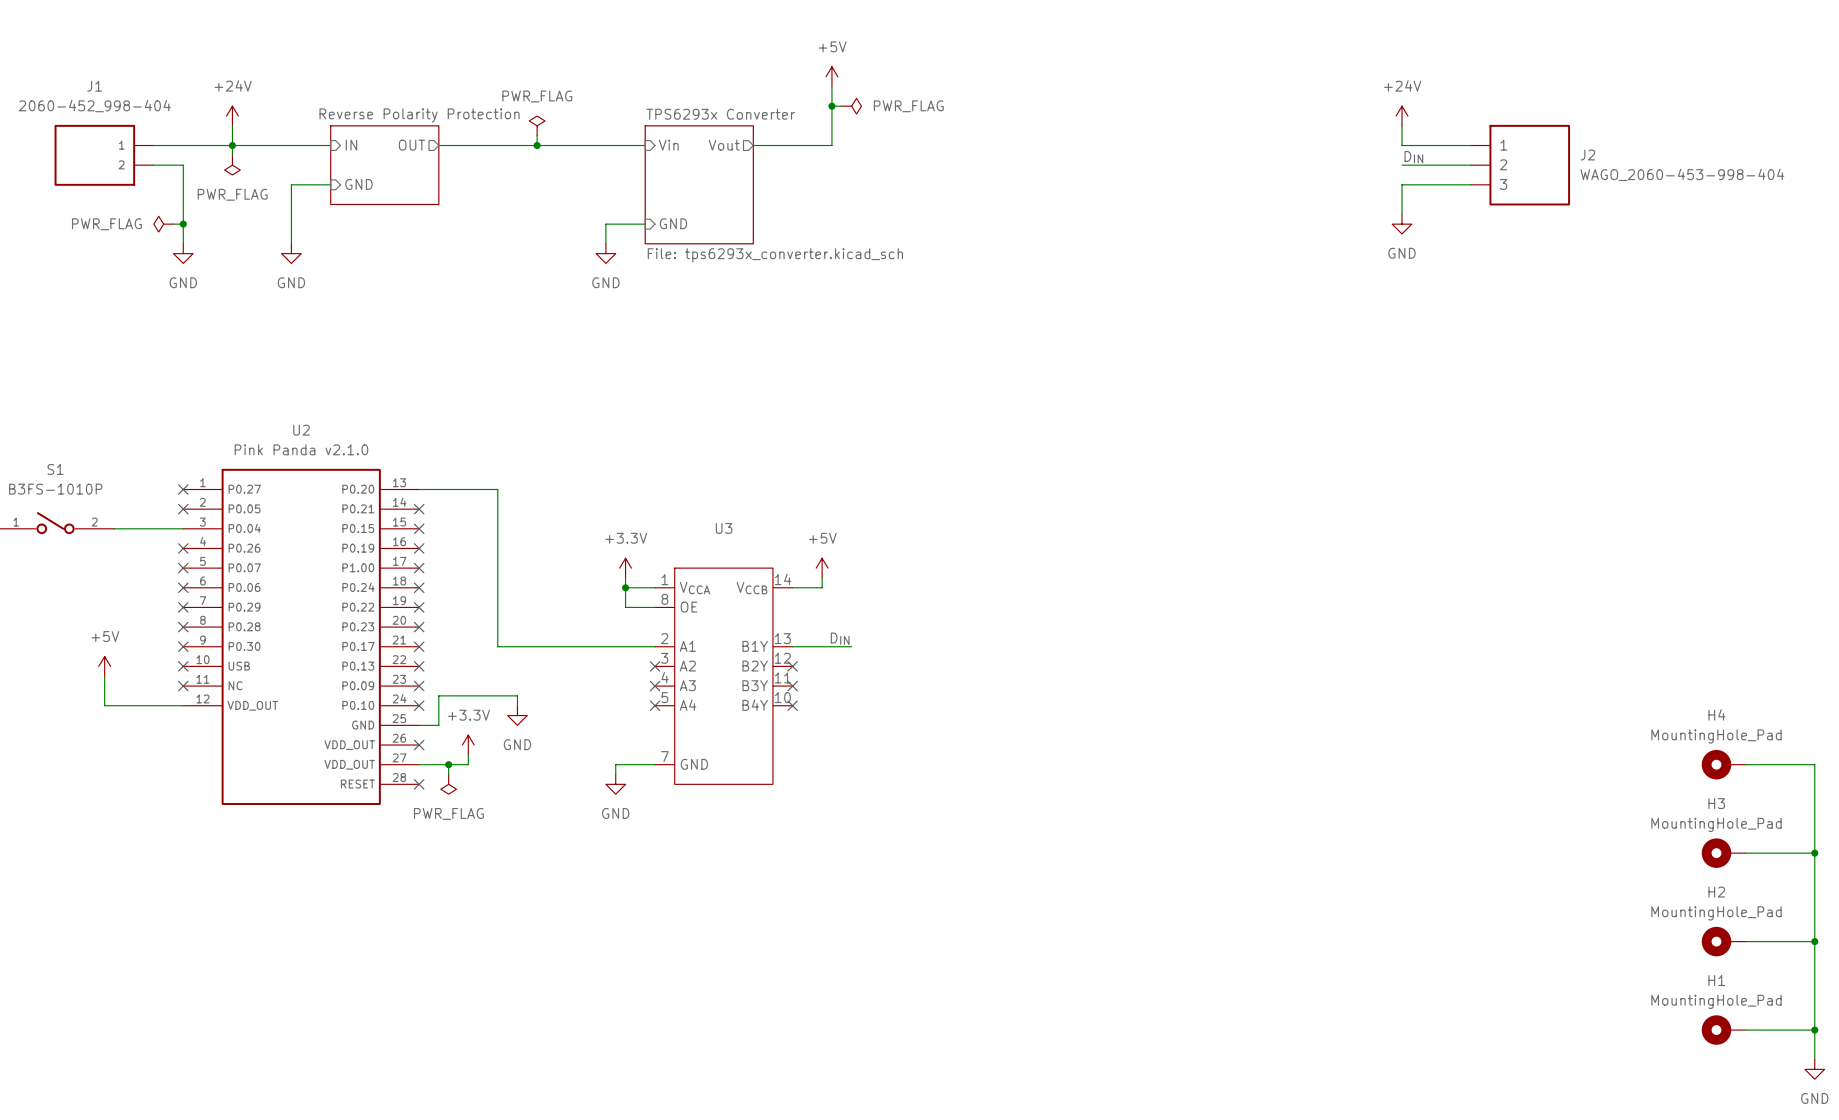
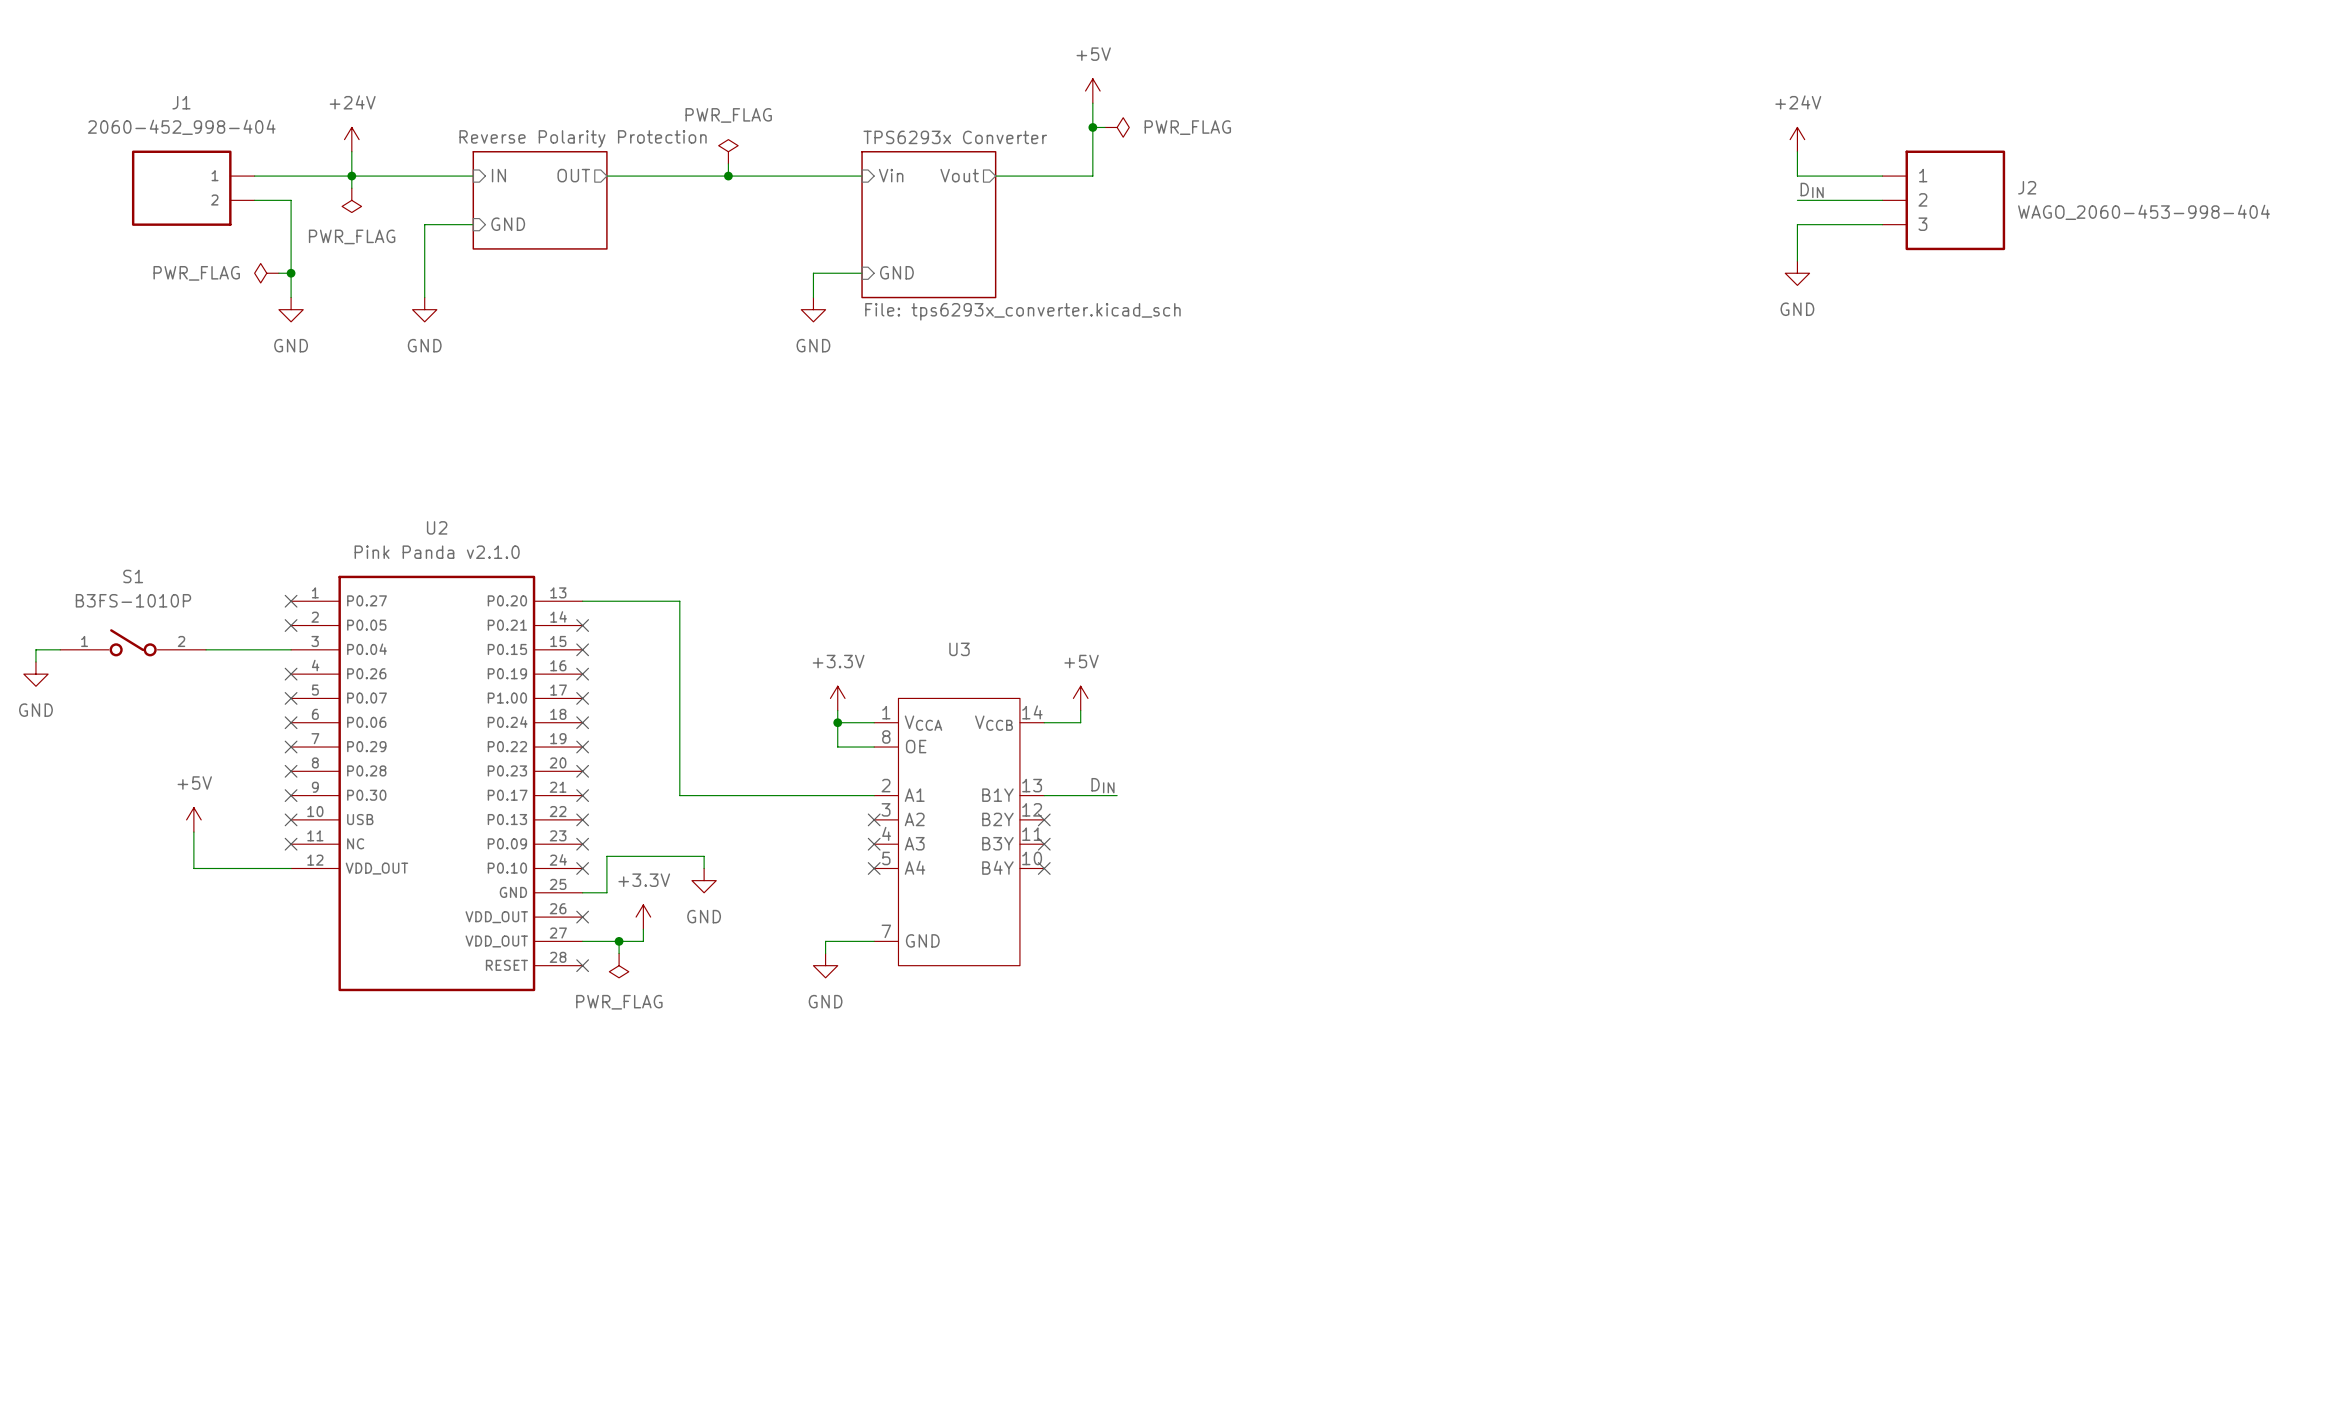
H4: MountingHole_Pad (1723, 764) -> none
wire: (1745, 764) (1814, 764) (1814, 1059) -> none
H3: MountingHole_Pad (1723, 853) -> none
wire: (1745, 853) (1814, 853) -> none
junction: (1814, 853) -> none
H2: MountingHole_Pad (1723, 941) -> none
wire: (1745, 941) (1814, 941) -> none
junction: (1814, 941) -> none
H1: MountingHole_Pad (1723, 1030) -> none
wire: (1745, 1030) (1814, 1030) -> none
junction: (1814, 1030) -> none
power symbol: GND (1814, 1069) -> none

